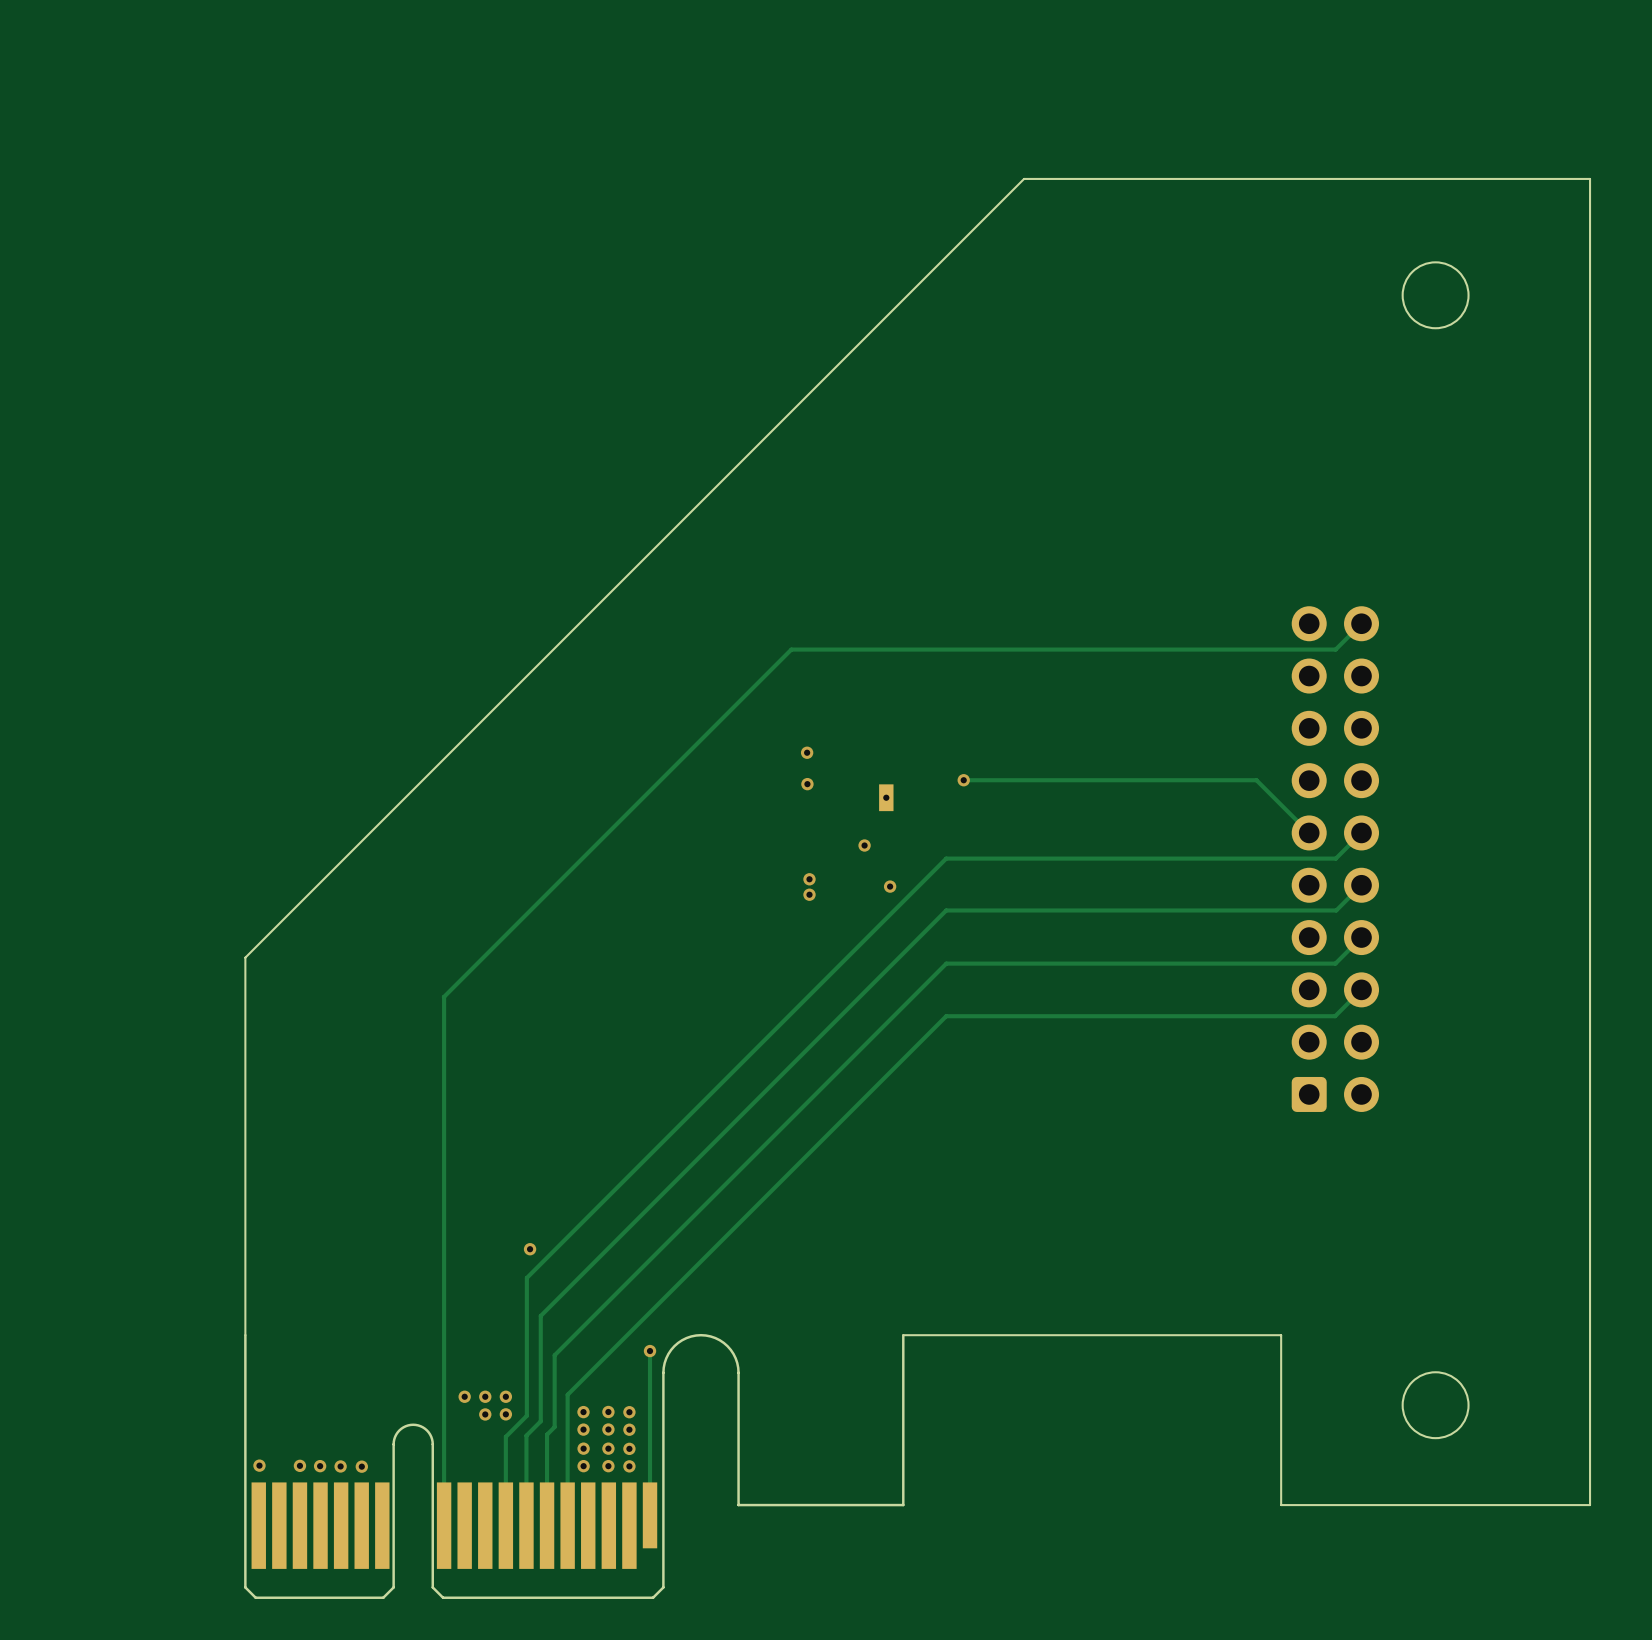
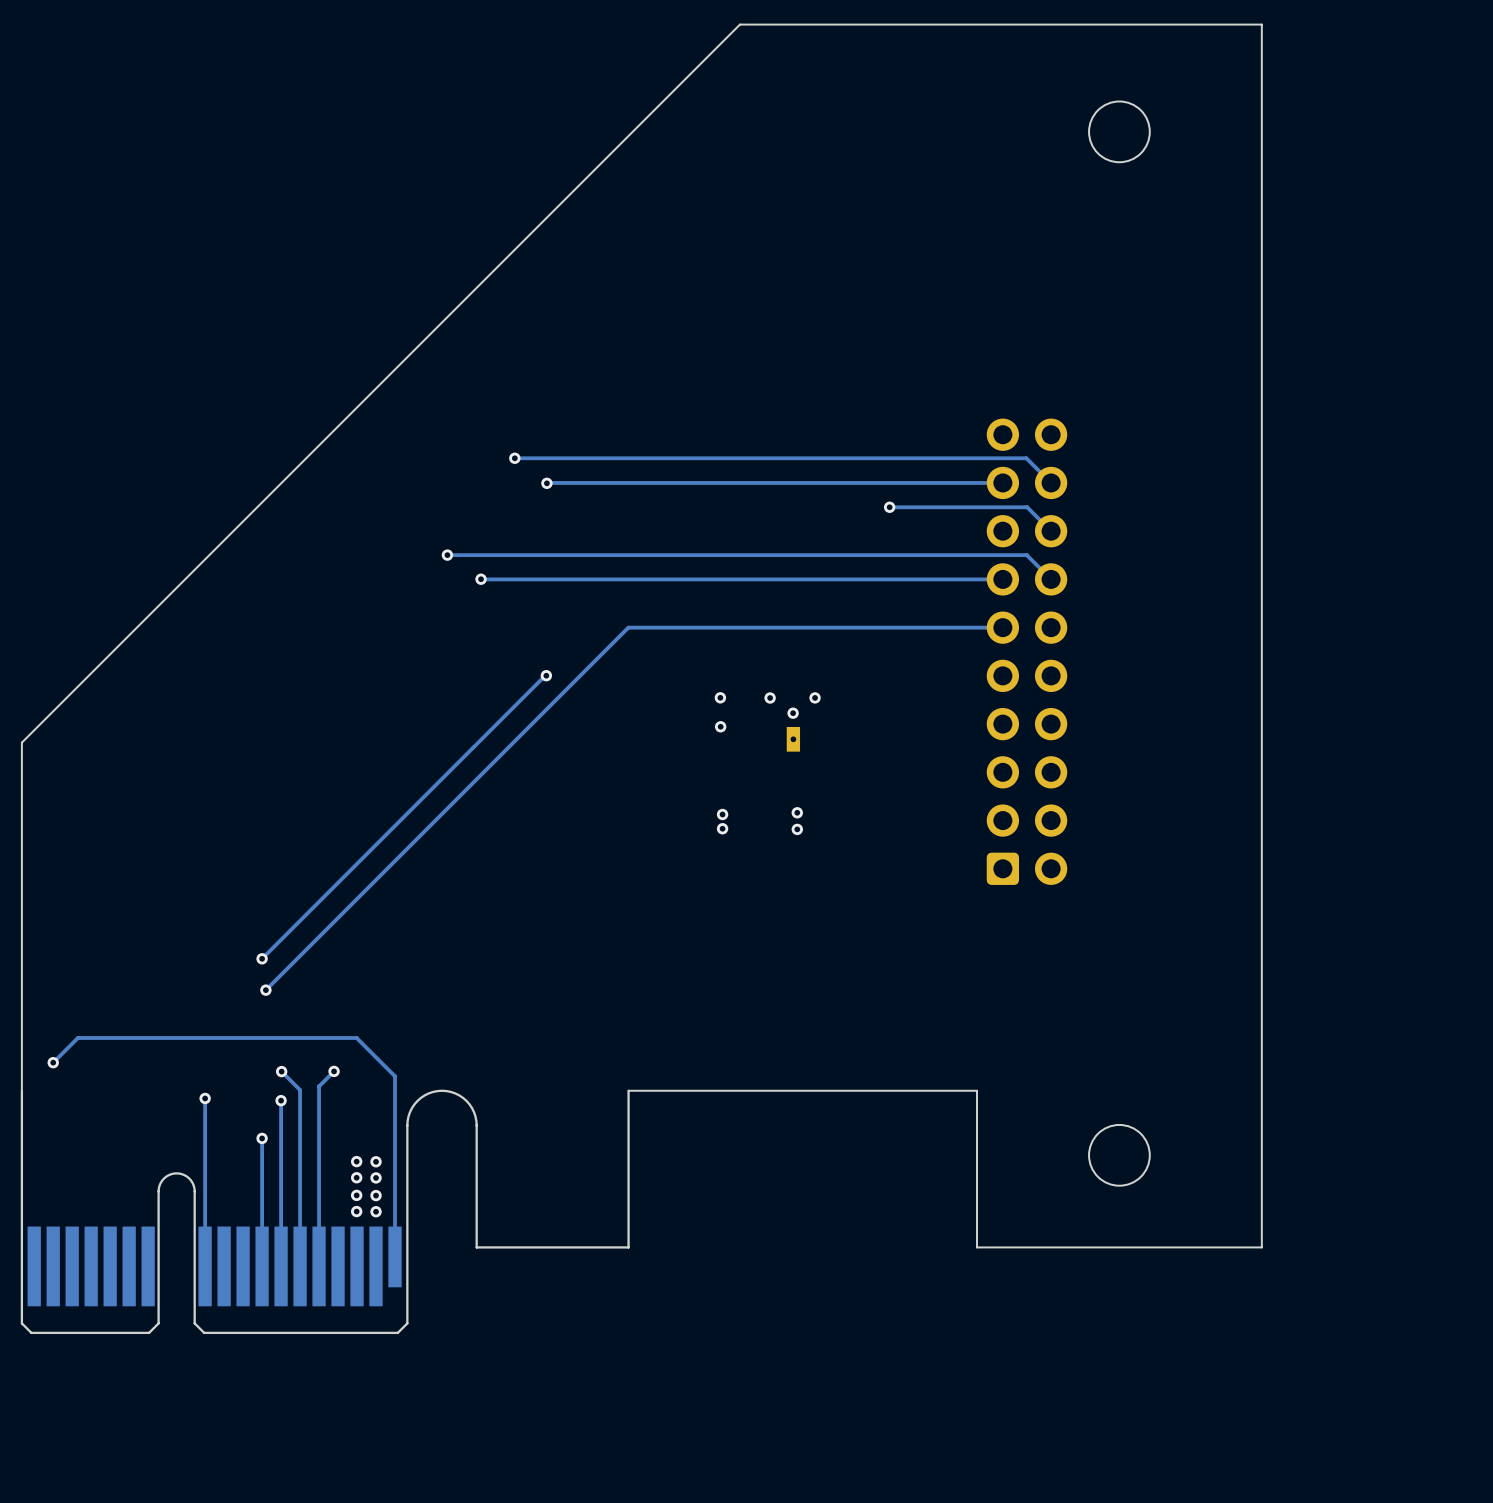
round board edge position: (1435, 295) -> (1119, 131)
track: none -> (514, 458) (1026, 458) (1051, 482)
via: none -> (514, 458)
track: none -> (1002, 482) (546, 483)
via: none -> (546, 483)
track: none -> (889, 507) (1027, 507) (1051, 531)
via: none -> (889, 507)
track: none -> (447, 555) (1026, 555) (1051, 579)
via: none -> (447, 555)
track: (1361, 623) (1335, 649) (791, 649) (443, 997) -> none
via: none -> (481, 579)
track: none -> (1002, 579) (481, 579)
track: none -> (1002, 627) (628, 627) (265, 990)
track: none -> (546, 675) (262, 958)
via: none -> (546, 675)
via: none -> (770, 698)
via: none -> (815, 697)
via: none -> (793, 713)
track: (963, 780) (1256, 780) (1309, 832) -> none
via: (963, 780) -> none
track: (1361, 832) (1335, 858) (946, 858) (526, 1277) (526, 1415) (505, 1436) (505, 1525) -> none
via: (864, 845) -> none
part position: (1335, 859) -> (1026, 651)
via: none -> (797, 812)
track: (1361, 885) (1336, 910) (946, 910) (540, 1315) (540, 1421) (526, 1435) (526, 1525) -> none
via: (890, 886) -> none
via: none -> (797, 829)
track: (1361, 937) (1335, 963) (946, 963) (554, 1355) (554, 1427) (547, 1434) (547, 1525) -> none
track: (1361, 989) (1335, 1016) (946, 1016) (567, 1394) (568, 1524) -> none
track: (444, 997) (444, 1525) -> none
via: none -> (262, 958)
via: none -> (265, 990)
track: none -> (53, 1062) (77, 1037) (356, 1037) (395, 1076) (395, 1256)
via: none -> (53, 1062)
track: none -> (334, 1071) (319, 1086) (319, 1266)
via: none -> (334, 1071)
track: none -> (281, 1071) (300, 1090) (300, 1266)
via: none -> (281, 1071)
track: none -> (205, 1098) (205, 1266)
via: none -> (205, 1098)
track: none -> (281, 1100) (281, 1266)
via: none -> (281, 1100)
track: none -> (262, 1138) (262, 1266)
via: none -> (262, 1138)
via: (530, 1249) -> none
via: none -> (356, 1161)
via: none -> (376, 1161)
via: none -> (356, 1177)
via: none -> (376, 1177)
via: none -> (356, 1195)
via: none -> (376, 1195)
via: none -> (356, 1211)
via: none -> (376, 1211)
board edge: (903, 1335) (1281, 1335) (1281, 1505) (1590, 1505) (1590, 178) (1024, 178) (245, 957) (245, 1335) -> (628, 1090) (977, 1090) (977, 1247) (1261, 1247) (1261, 24) (739, 24) (21, 742) (21, 1090)
track: (650, 1351) (650, 1515) -> none
via: (650, 1351) -> none
via: (464, 1396) -> none
via: (485, 1396) -> none
via: (505, 1396) -> none
round board edge position: (1435, 1405) -> (1119, 1155)
via: (583, 1412) -> none
via: (608, 1412) -> none
via: (629, 1412) -> none
via: (485, 1414) -> none
via: (505, 1414) -> none
via: (583, 1429) -> none
via: (608, 1429) -> none
via: (629, 1429) -> none
via: (583, 1448) -> none
via: (608, 1448) -> none
via: (629, 1448) -> none
via: (259, 1465) -> none
via: (299, 1465) -> none
via: (320, 1466) -> none
via: (340, 1466) -> none
via: (361, 1466) -> none
part position: (574, 1466) -> (325, 1211)
via: (583, 1466) -> none
via: (608, 1466) -> none
via: (629, 1466) -> none

